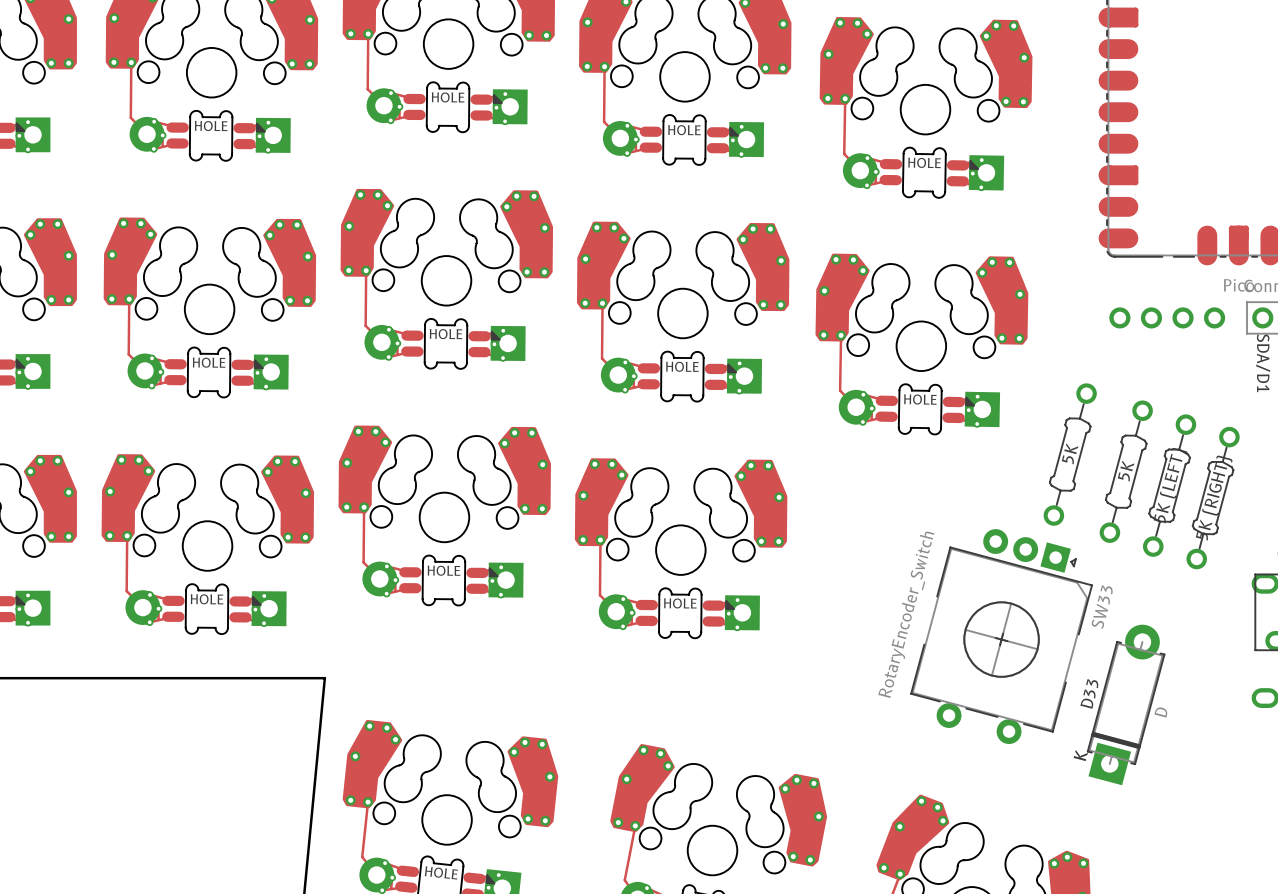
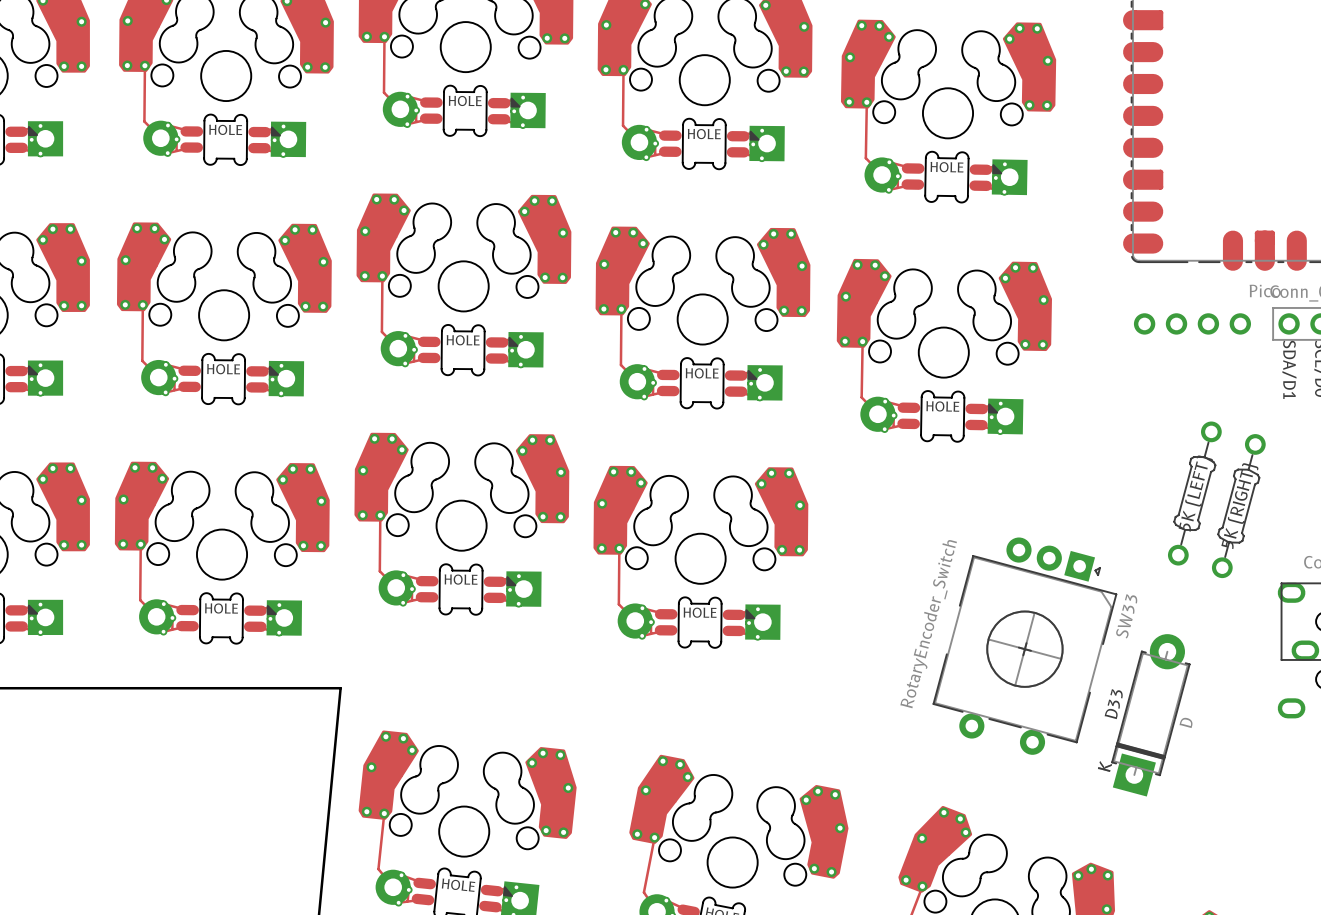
part: 5K (1070, 454) -> none
part: 5K (1126, 471) -> none

